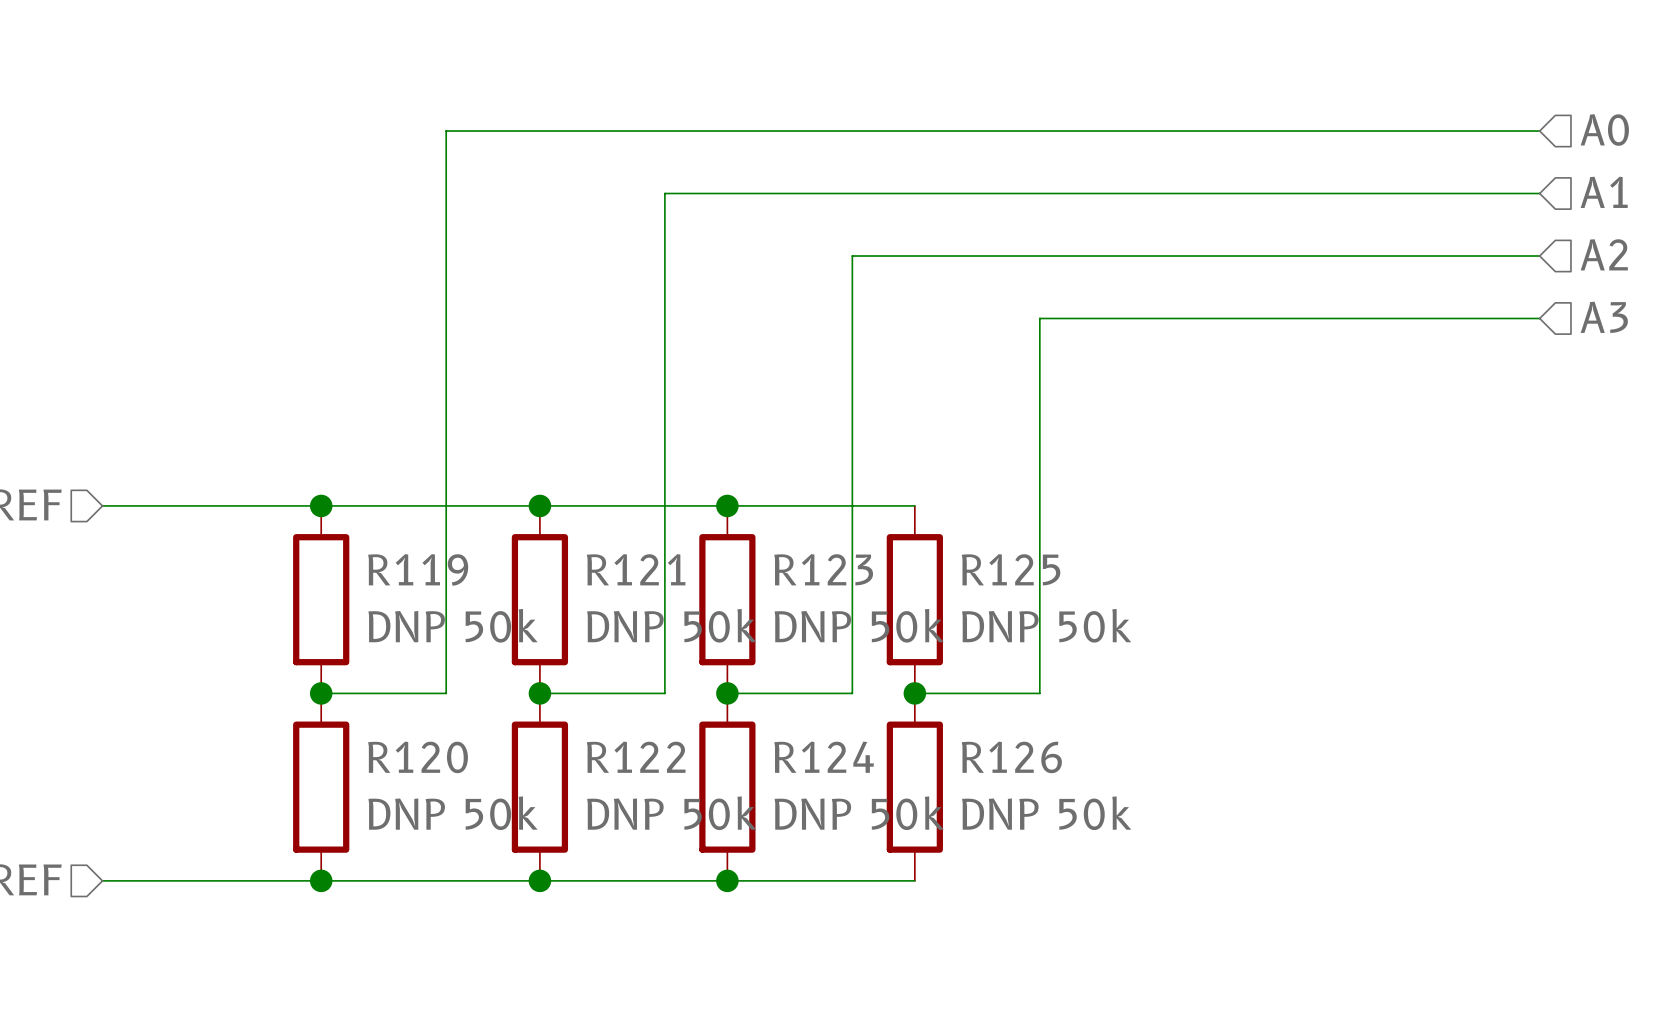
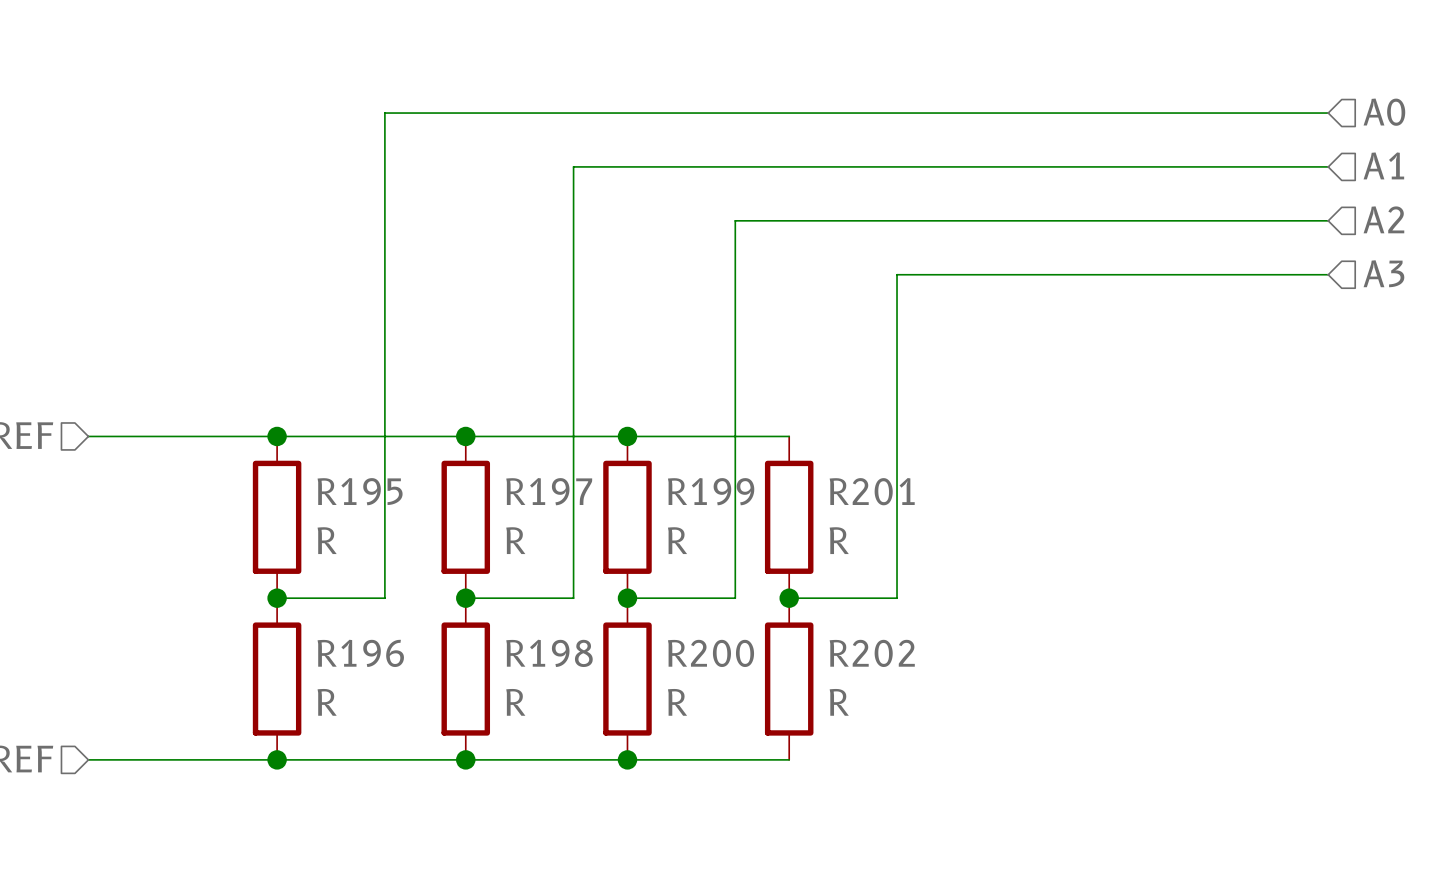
R119 name: R119 (418, 569) -> R195 (360, 491)
R121 name: R121 (636, 569) -> R197 (549, 491)
R123 name: R123 (823, 569) -> R199 (711, 491)
R125 name: R125 (1011, 569) -> R201 (872, 491)
R119 value: DNP 50k (453, 625) -> R (327, 540)
R121 value: DNP 50k (671, 625) -> R (515, 540)
R123 value: DNP 50k (859, 625) -> R (677, 540)
R125 value: DNP 50k (1046, 625) -> R (839, 540)
R120 name: R120 (418, 757) -> R196 (360, 653)
R122 name: R122 (636, 757) -> R198 (549, 653)
R124 name: R124 (824, 757) -> R200 (711, 653)
R126 name: R126 (1011, 757) -> R202 (872, 653)
R120 value: DNP 50k (453, 813) -> R (327, 702)
R122 value: DNP 50k (671, 813) -> R (515, 702)
R124 value: DNP 50k (859, 813) -> R (677, 702)
R126 value: DNP 50k (1046, 813) -> R (839, 702)

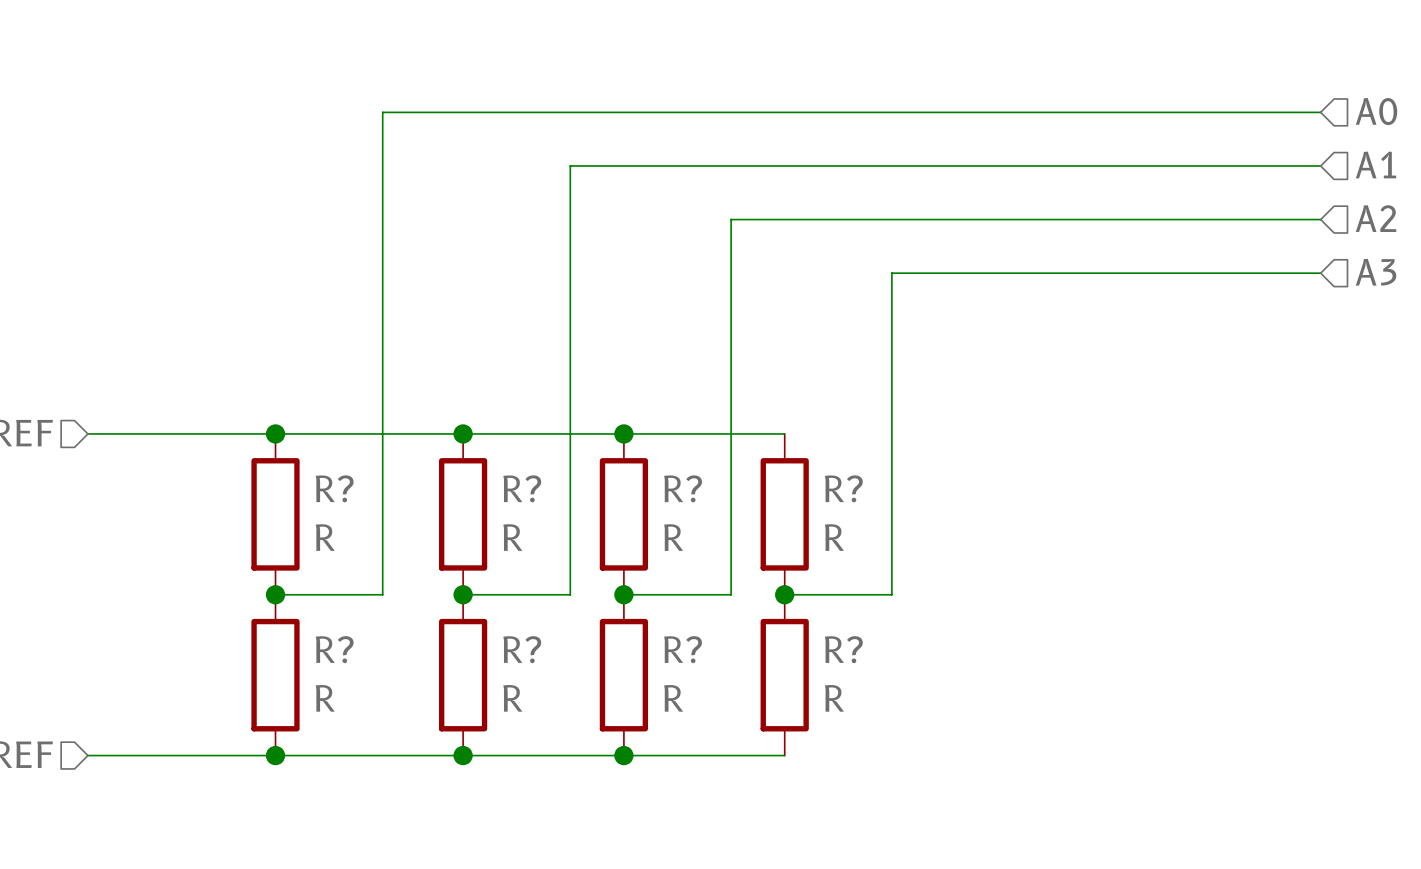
R195 name: R195 (360, 491) -> R? (334, 488)
R197 name: R197 (549, 491) -> R? (522, 488)
R199 name: R199 (711, 491) -> R? (683, 488)
R201 name: R201 (872, 491) -> R? (843, 488)
R196 name: R196 (360, 653) -> R? (334, 649)
R198 name: R198 (549, 653) -> R? (522, 649)
R200 name: R200 (711, 653) -> R? (683, 649)
R202 name: R202 (872, 653) -> R? (843, 649)

